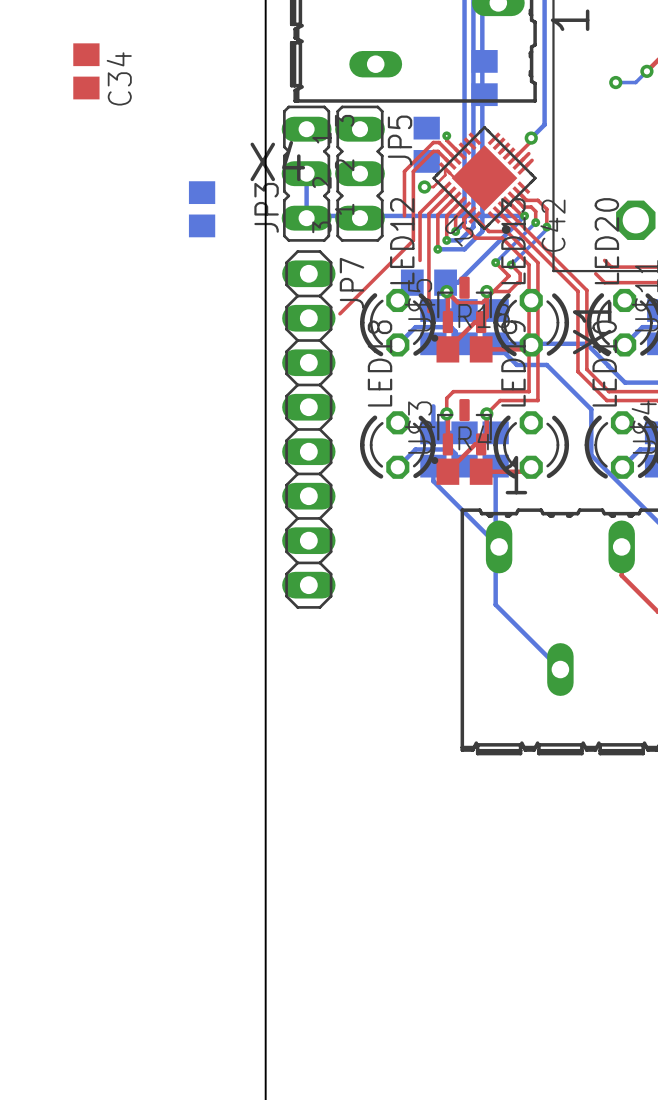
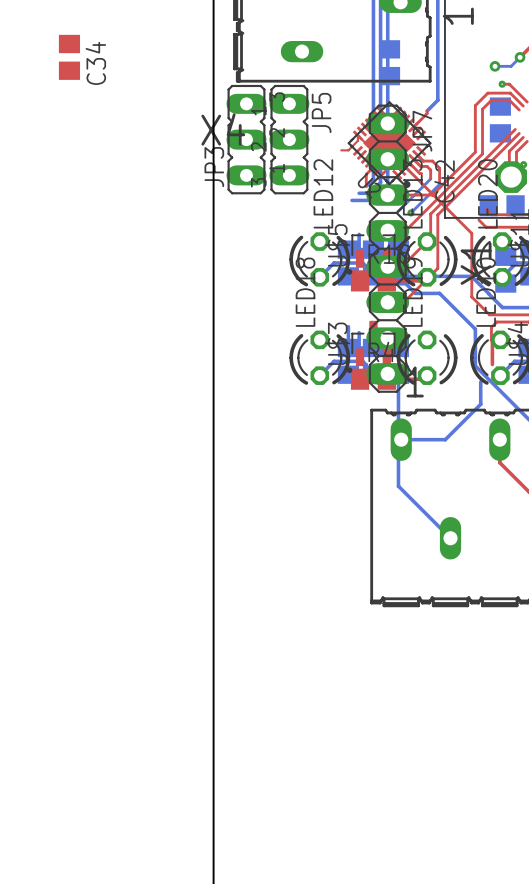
top track: none -> (502, 84) (509, 84) (527, 102)
via: none -> (502, 84)
top track: none -> (523, 106) (510, 93) (487, 93) (475, 105) (475, 152) (432, 195) (387, 195)
top track: (446, 135) (446, 140) (460, 153) -> none
via: (446, 135) -> none
top track: none -> (519, 110) (509, 100) (491, 100) (482, 109) (482, 153) (405, 230) (387, 230)
via: (531, 138) -> none
part: (426, 144) -> none
part: none -> (500, 119)
top track: (528, 153) (518, 163) -> none
top track: (455, 158) (439, 142) (433, 142) (404, 171) (404, 215) -> none
top track: (532, 160) (523, 168) -> none
top track: none -> (515, 129) (430, 214) (430, 237) (402, 266) (387, 266)
top track: (450, 163) (438, 151) (433, 151) (413, 171) (413, 240) (339, 313) -> none
top track: none -> (519, 133) (437, 214) (437, 268) (403, 302) (387, 302)
bottom track: (306, 173) (306, 215) (524, 215) (457, 282) (445, 282) -> none
via: (424, 187) -> none
top track: (445, 187) (420, 212) (420, 260) -> none
top track: (450, 192) (428, 213) (428, 311) -> none
top track: (455, 197) (437, 214) (437, 249) -> (523, 137) (509, 151) (509, 178)
top track: (460, 202) (446, 215) (446, 240) -> (527, 141) (516, 152) (516, 171)
via: none -> (523, 164)
part: (202, 209) -> none
top track: (470, 212) (464, 218) (464, 226) (475, 238) (502, 238) (529, 264) (529, 391) (453, 391) (446, 398) (447, 444) -> none
top track: (499, 212) (577, 291) (577, 371) (606, 400) (618, 400) -> (492, 364) (491, 327) (496, 322)
via: (524, 215) -> none
top track: (474, 217) (489, 231) (506, 231) (537, 262) (537, 400) (500, 400) (486, 413) (486, 438) (481, 444) (475, 444) (447, 471) -> none
via: (535, 222) -> none
via: (546, 227) -> none
via: (455, 231) -> none
via: (446, 240) -> none
via: (437, 249) -> none
part: none -> (502, 205)
top track: (495, 262) (509, 275) (482, 302) (457, 302) (446, 291) -> none
via: (495, 262) -> none
top track: (511, 264) (520, 273) (520, 282) (509, 291) (486, 291) (486, 316) (481, 322) (475, 322) (447, 349) -> none
part: (428, 282) -> none
via: (446, 291) -> none
via: (486, 291) -> none
top track: (447, 292) (447, 322) -> none
part: none -> (505, 270)
via: (446, 413) -> none
via: (486, 413) -> none
JP7 position: (308, 429) -> (387, 248)
bottom track: (433, 466) (433, 481) (499, 546) -> (480, 381) (480, 404) (445, 439) (401, 439)

